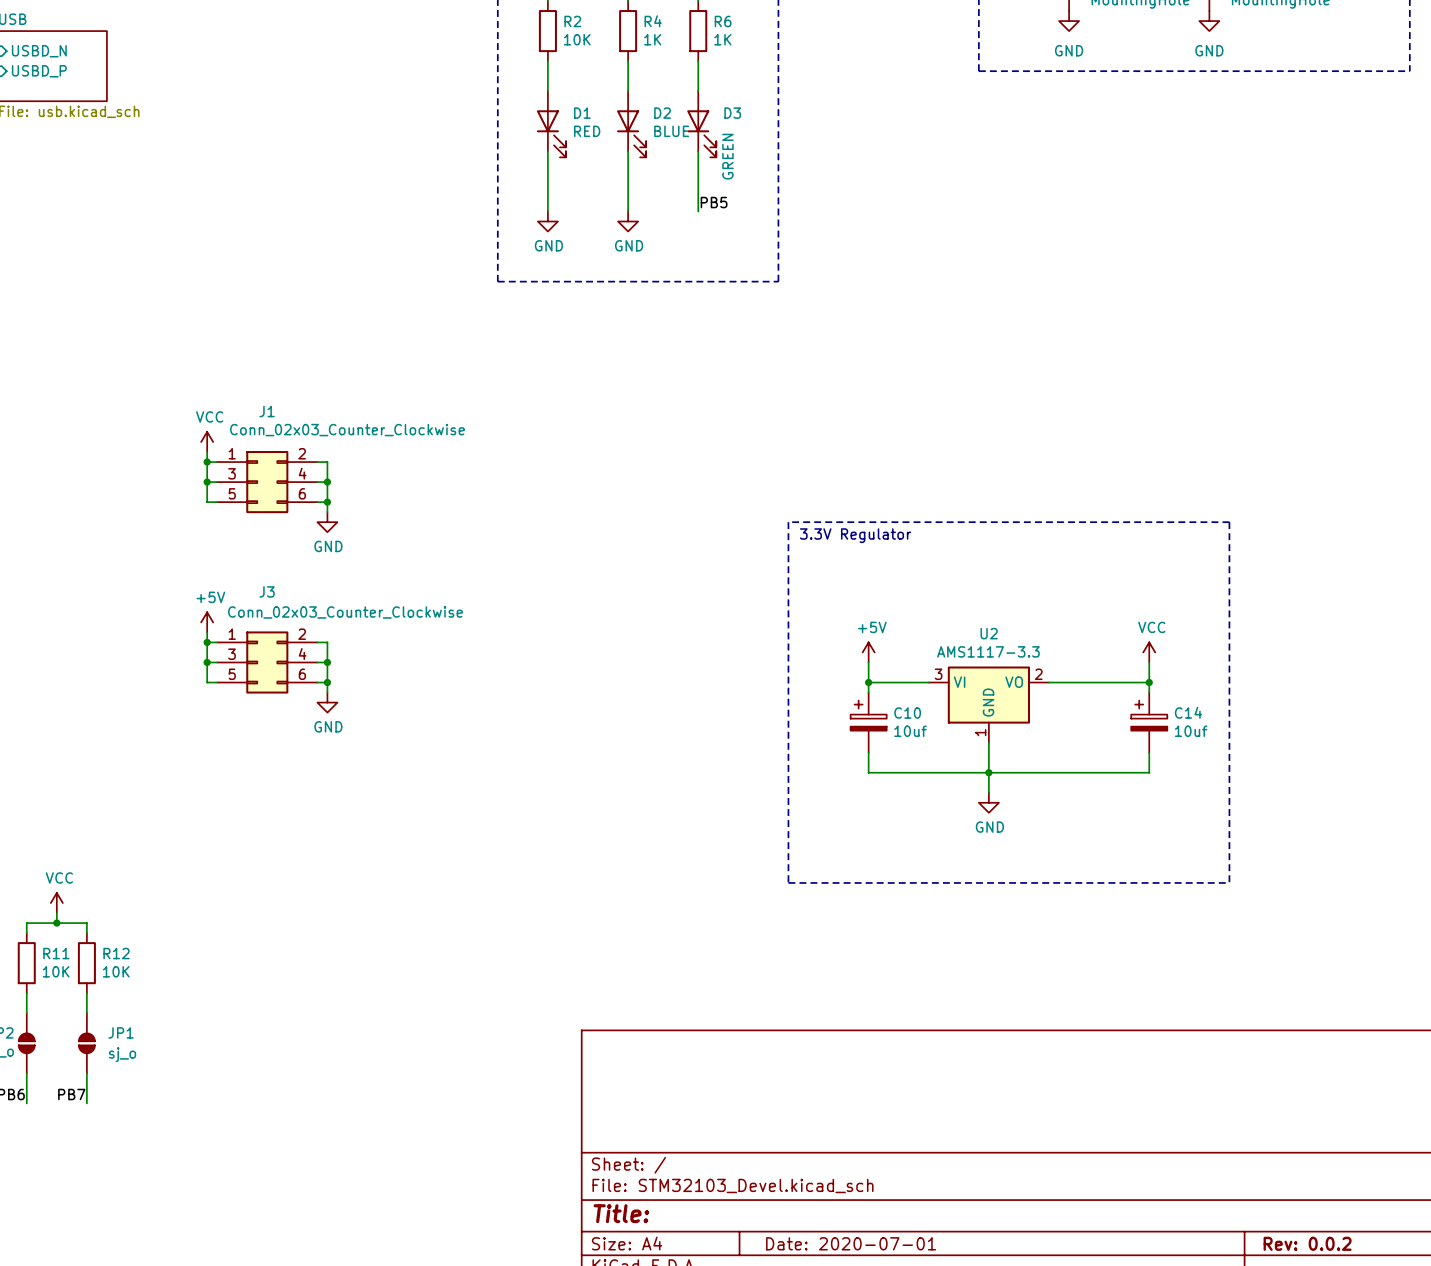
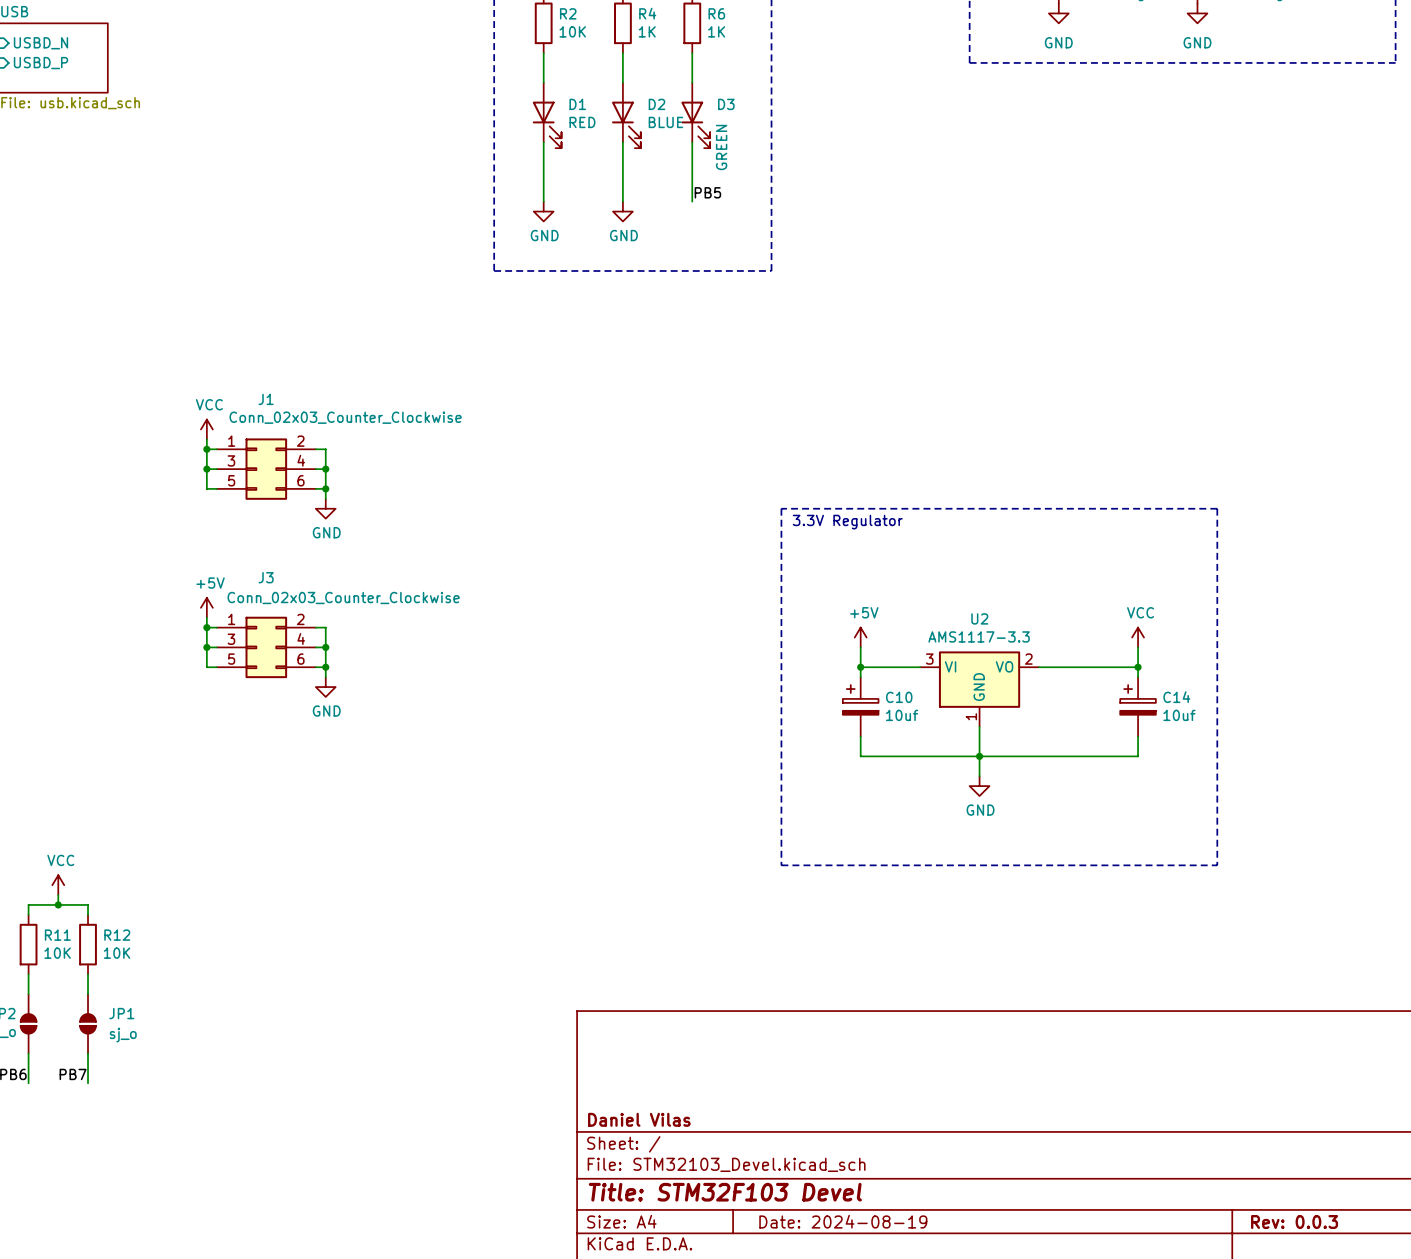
title block: none -> Daniel Vilas (639, 1119)
title block: Title: (621, 1213) -> Title: STM32F103 Devel (725, 1192)
title block: Date: 2020-07-01 (851, 1243) -> Date: 2024-08-19 (843, 1221)
title block: Rev: 0.0.2 (1307, 1243) -> Rev: 0.0.3 (1294, 1222)

